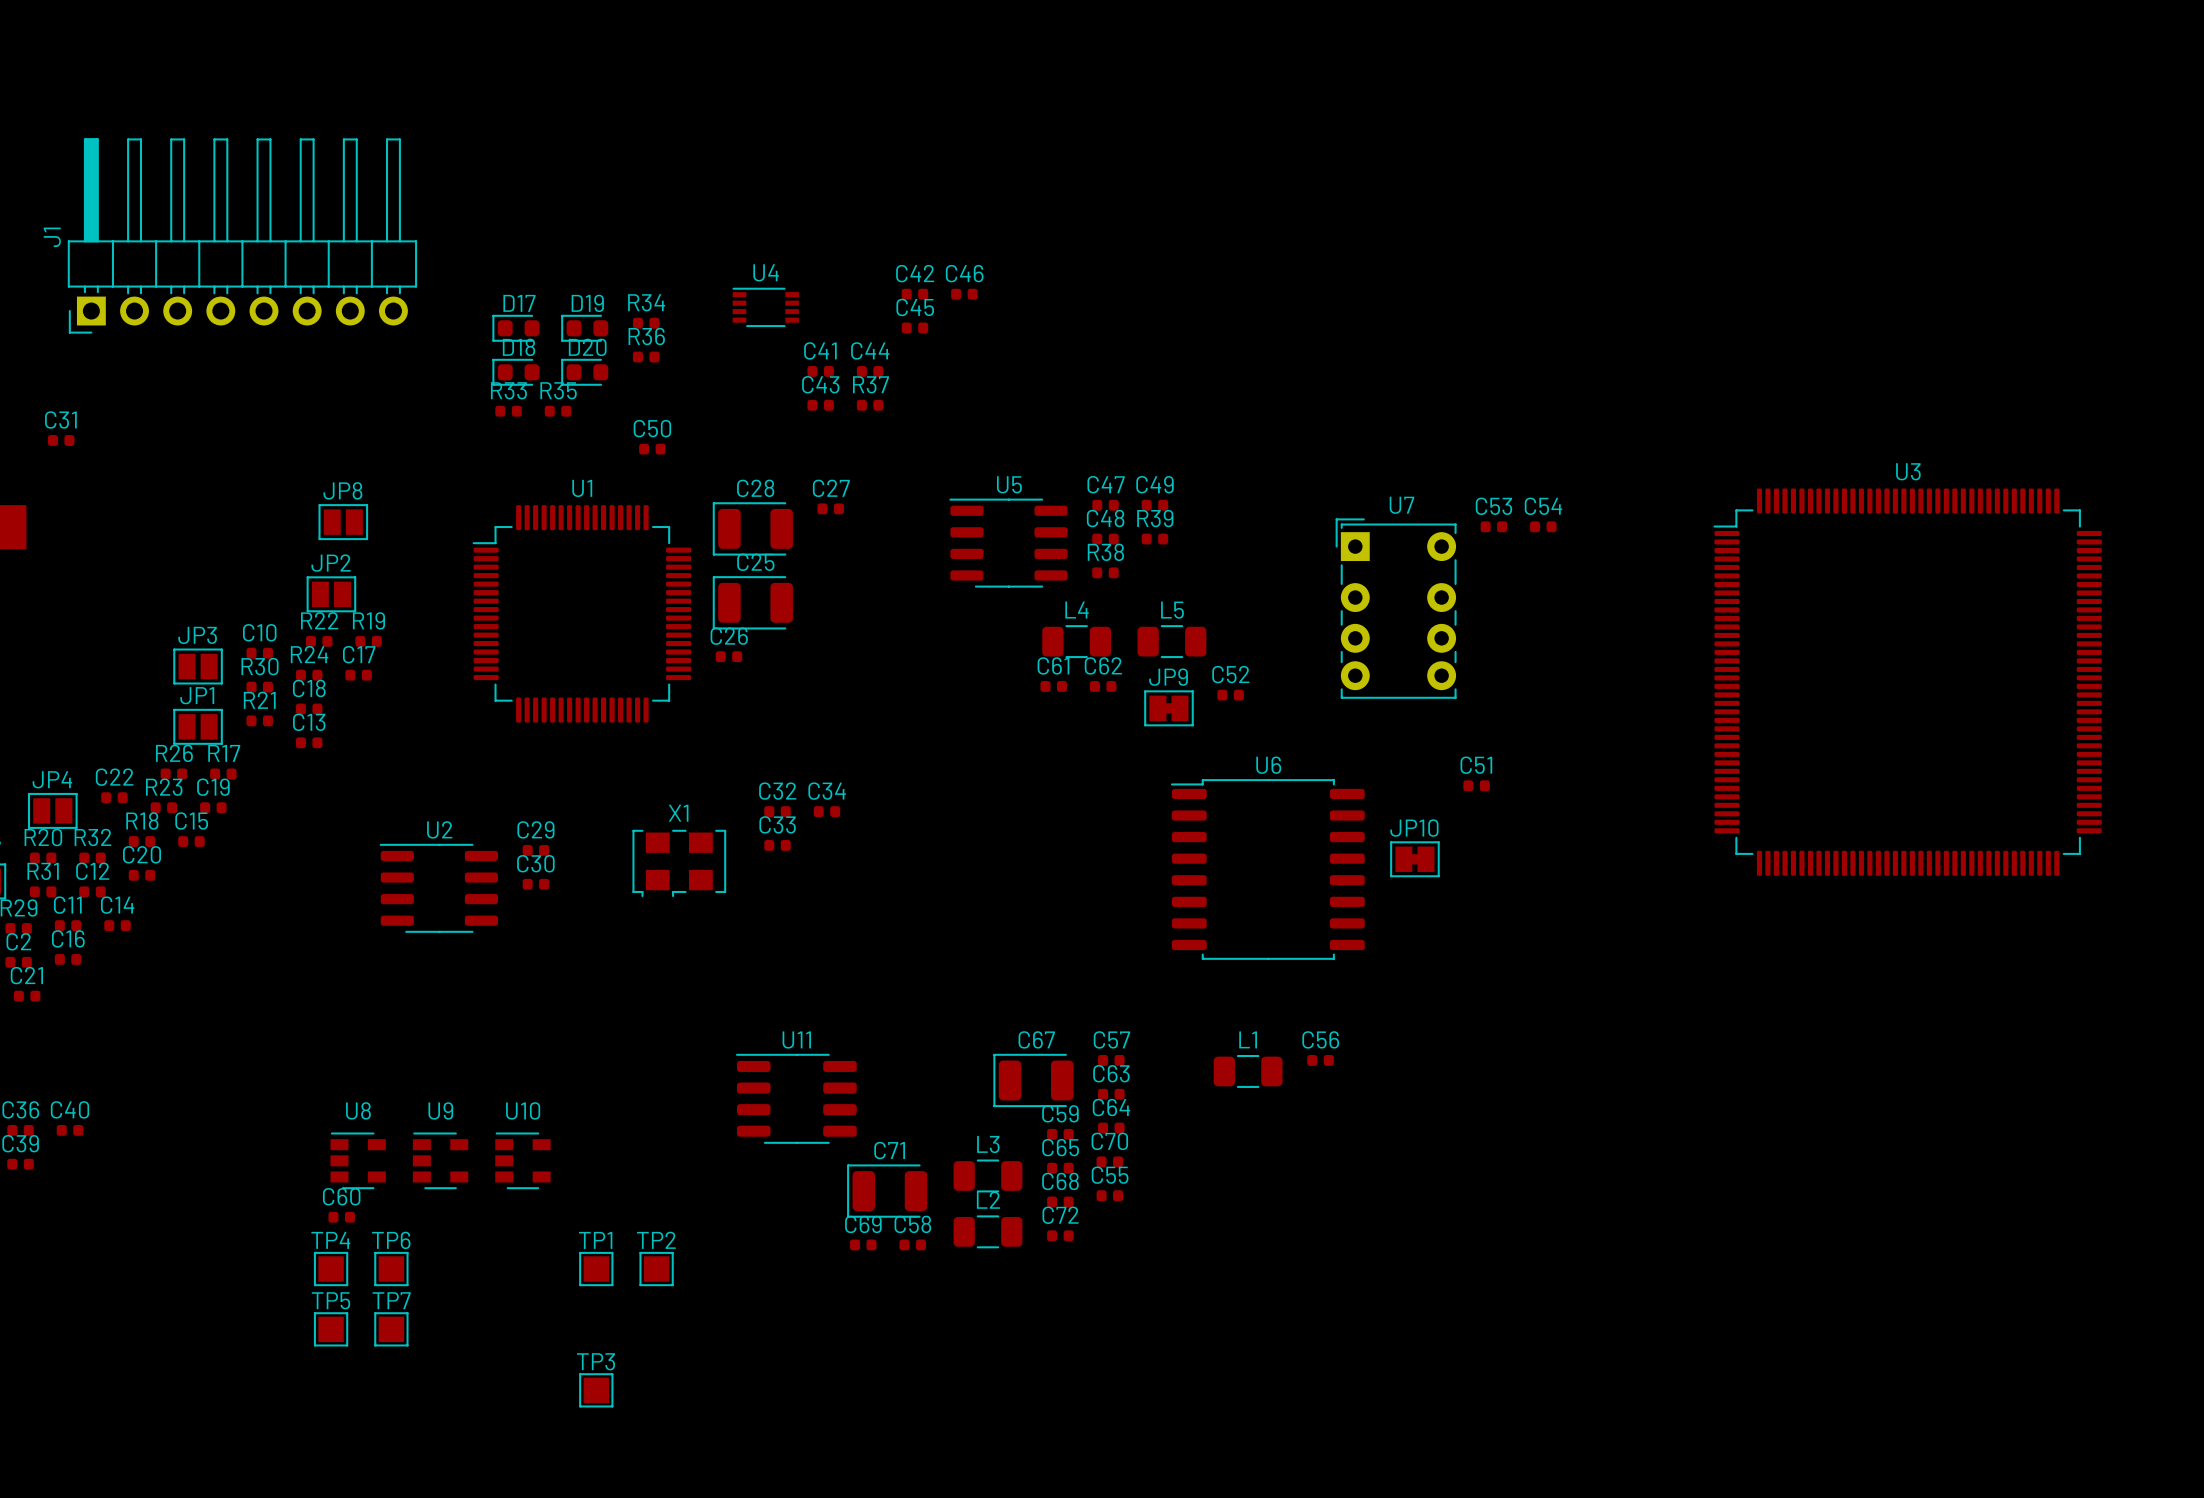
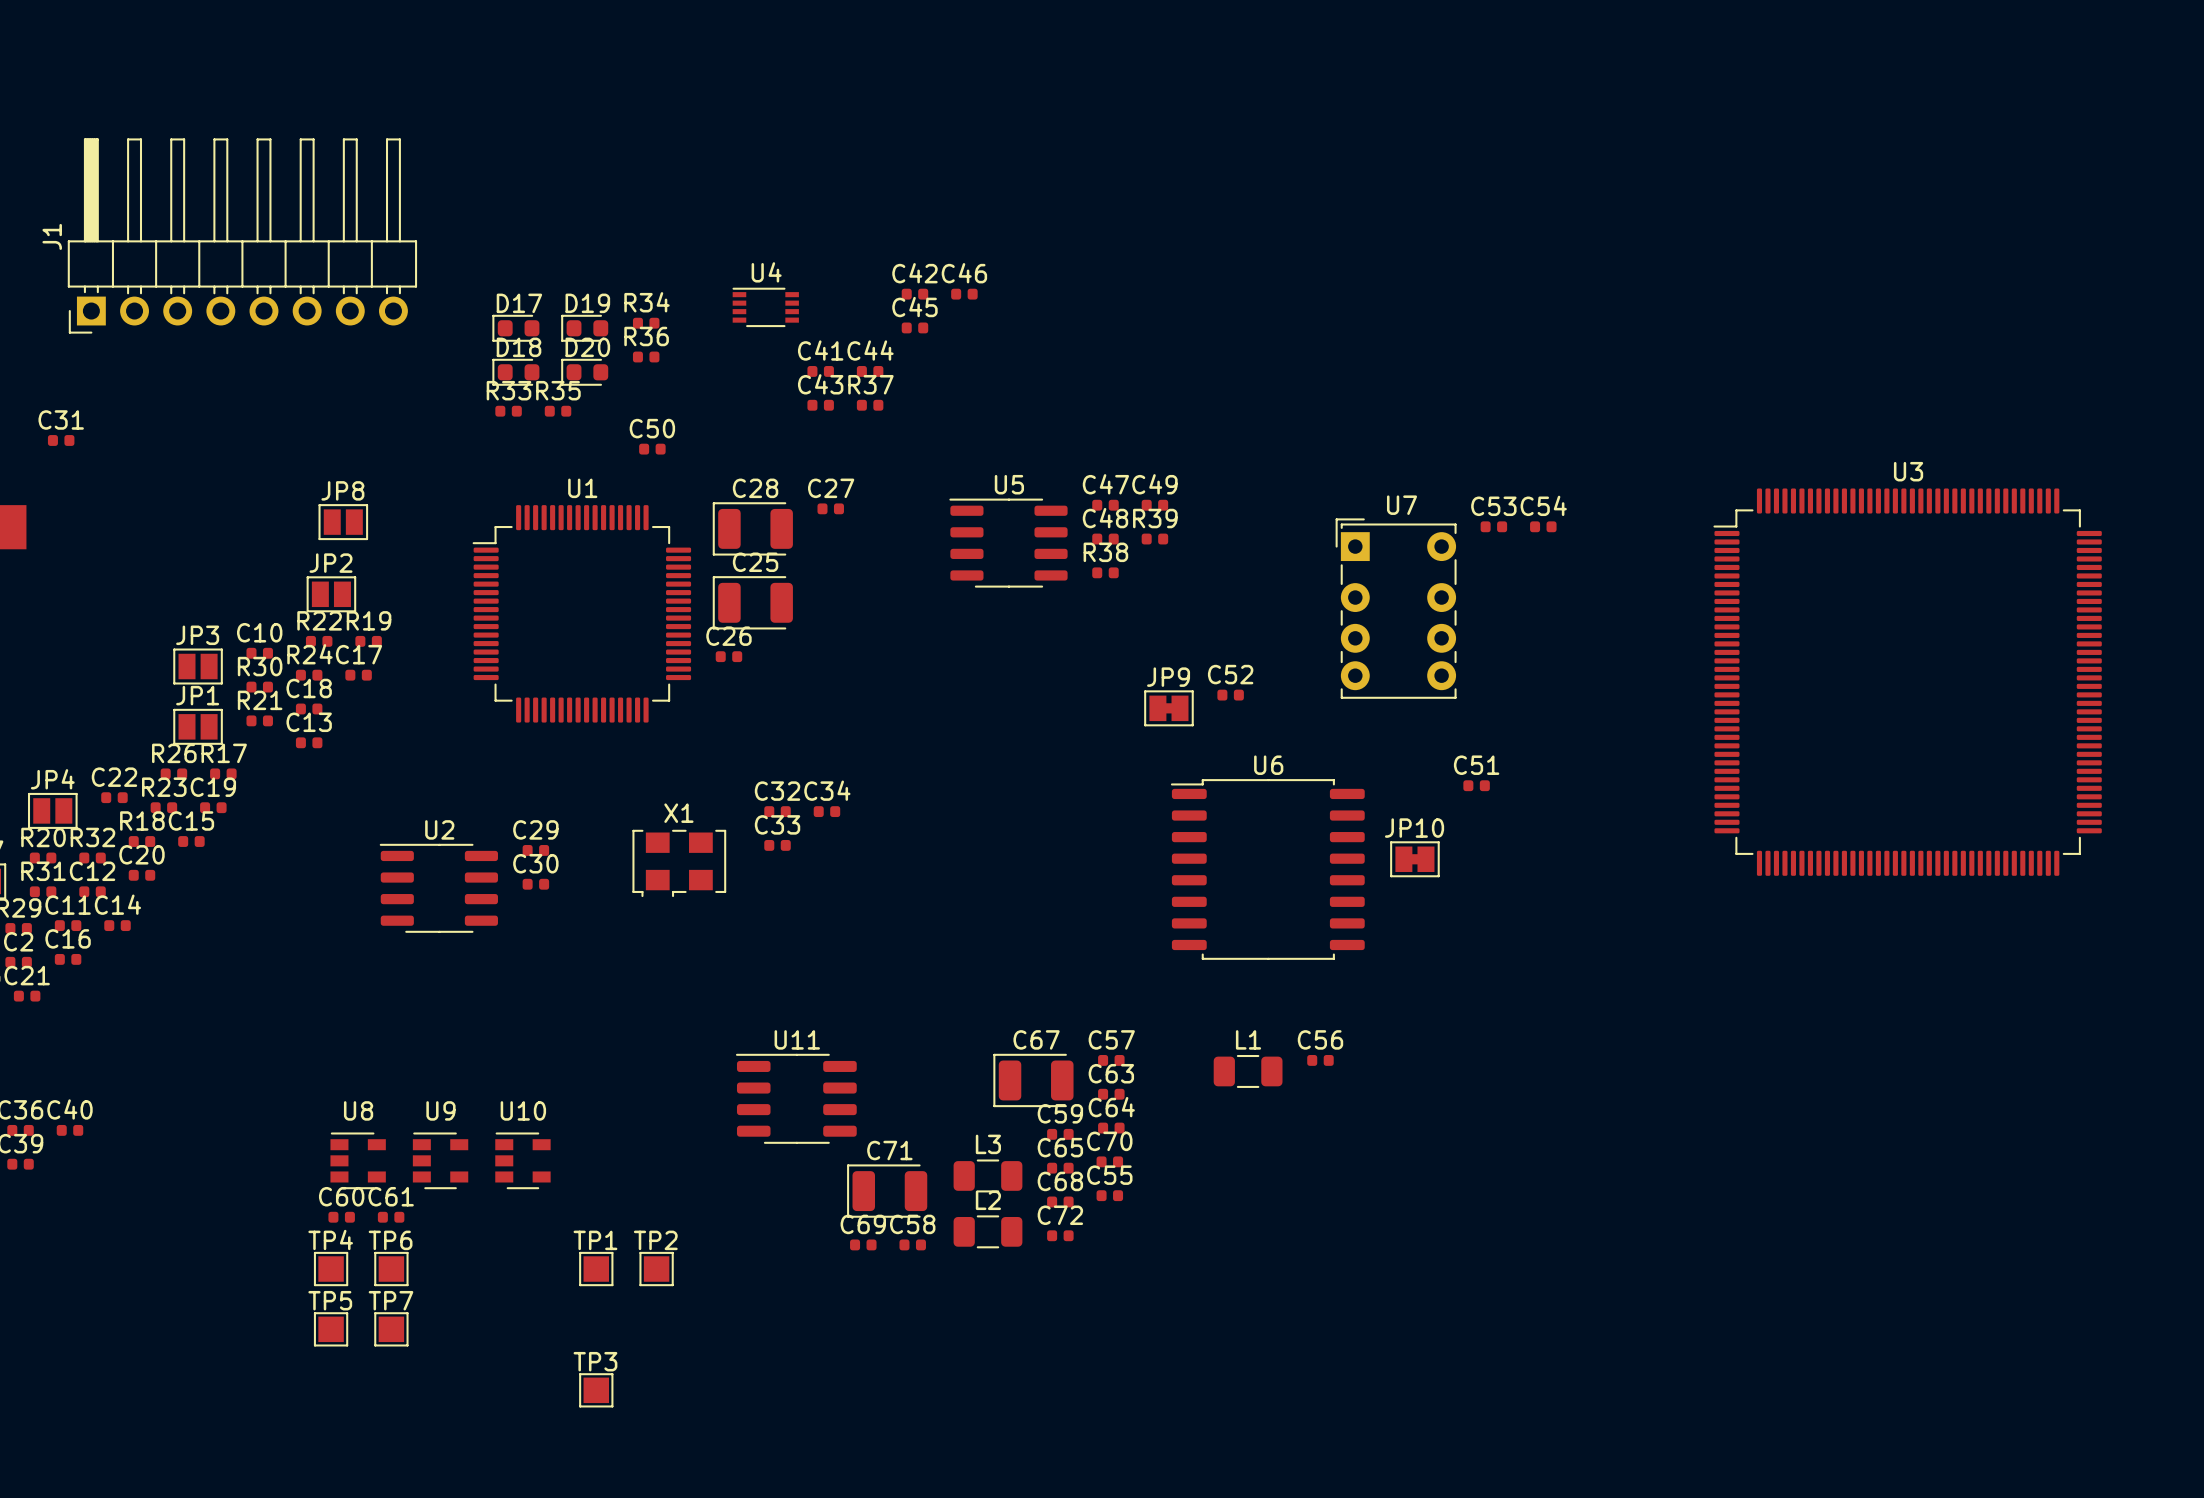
L4: (1076, 641) -> none
L5: (1171, 641) -> none
C61 position: (1053, 686) -> (391, 1217)
C62: (1103, 686) -> none

